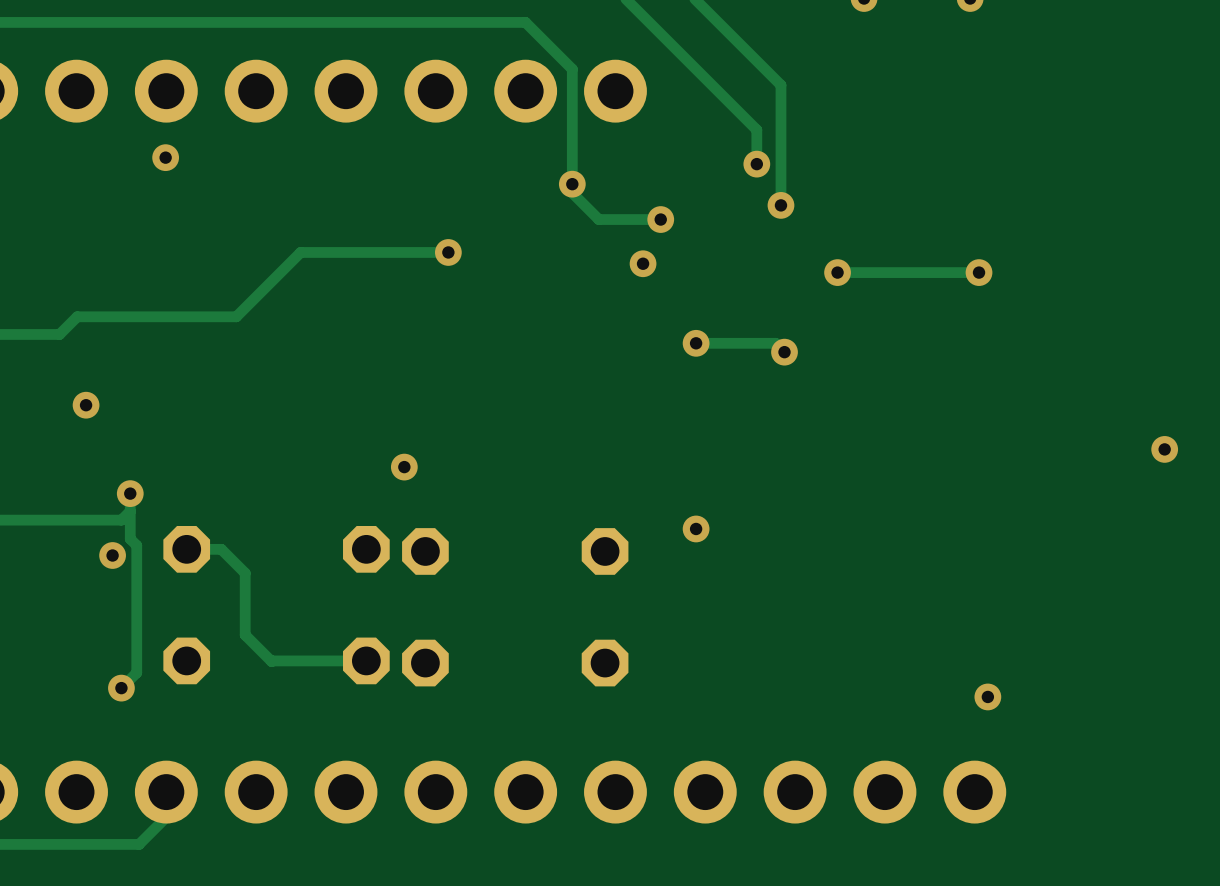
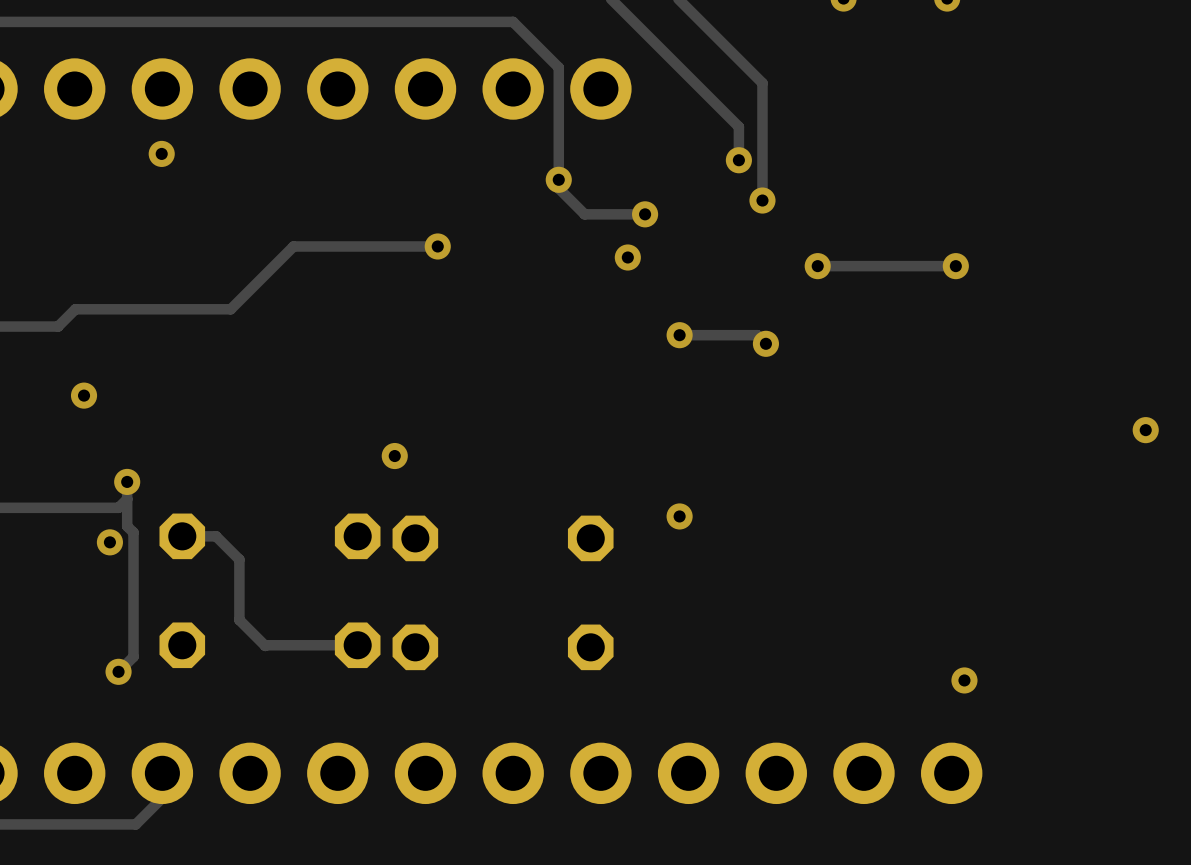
via position: (1164, 449) -> (1145, 430)

